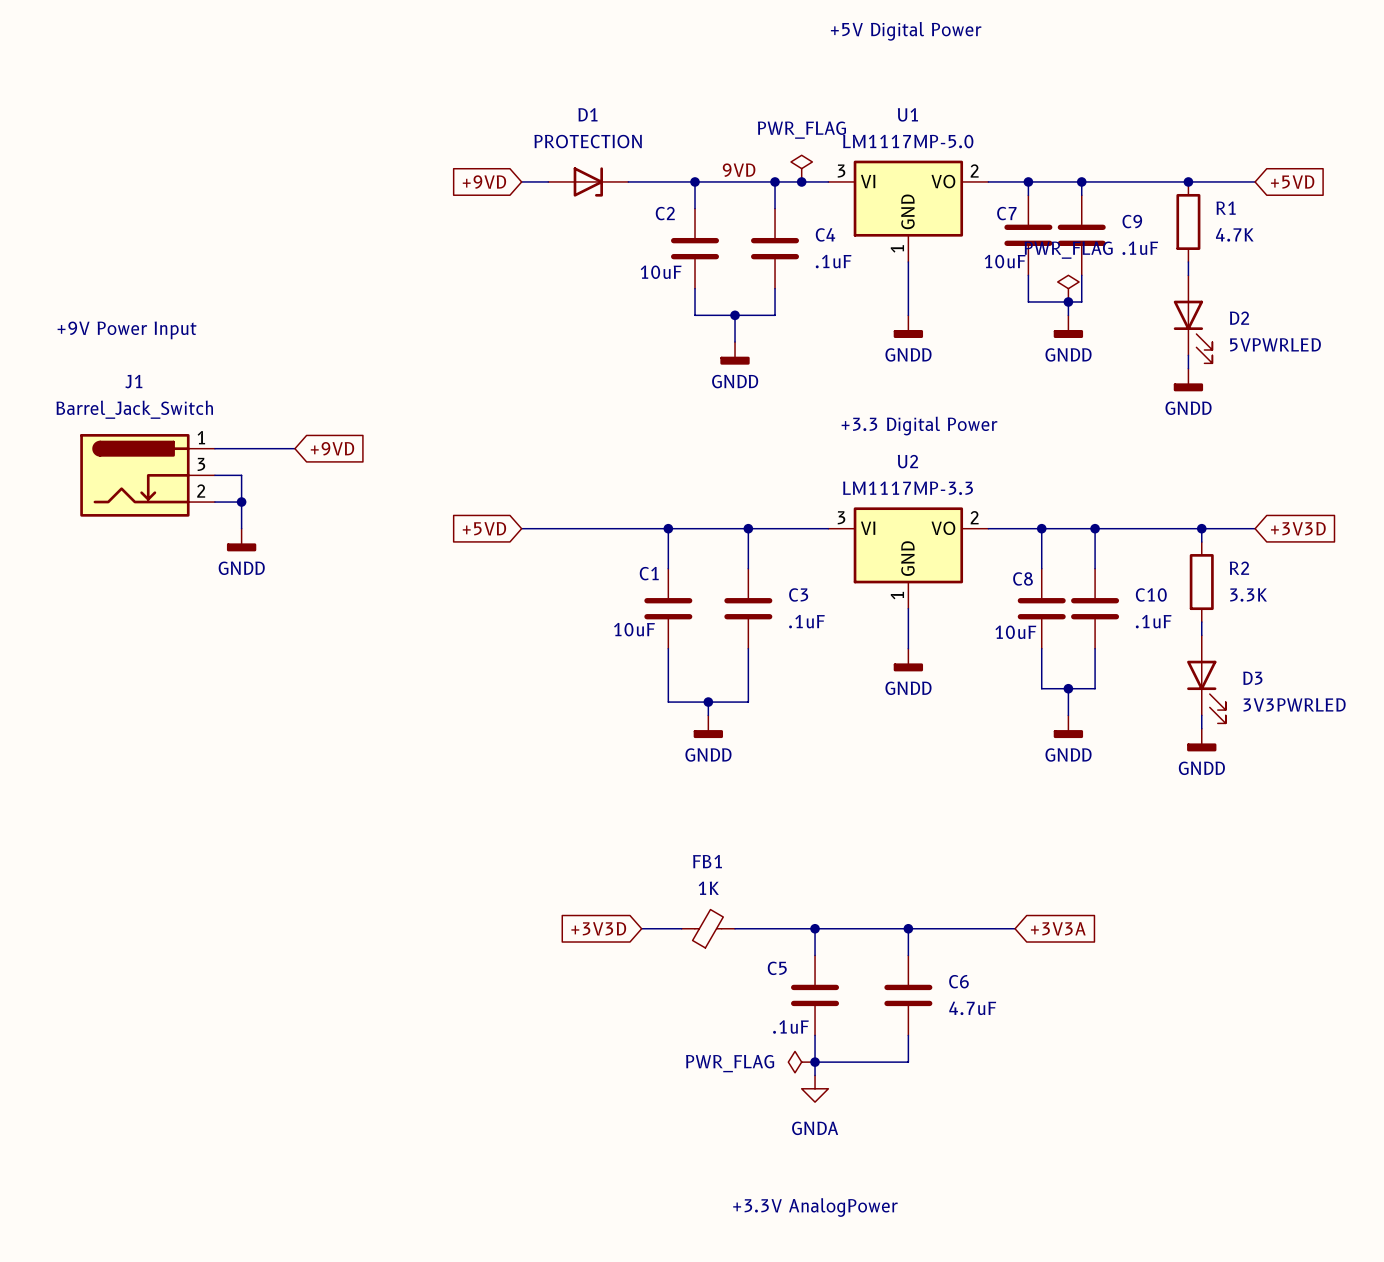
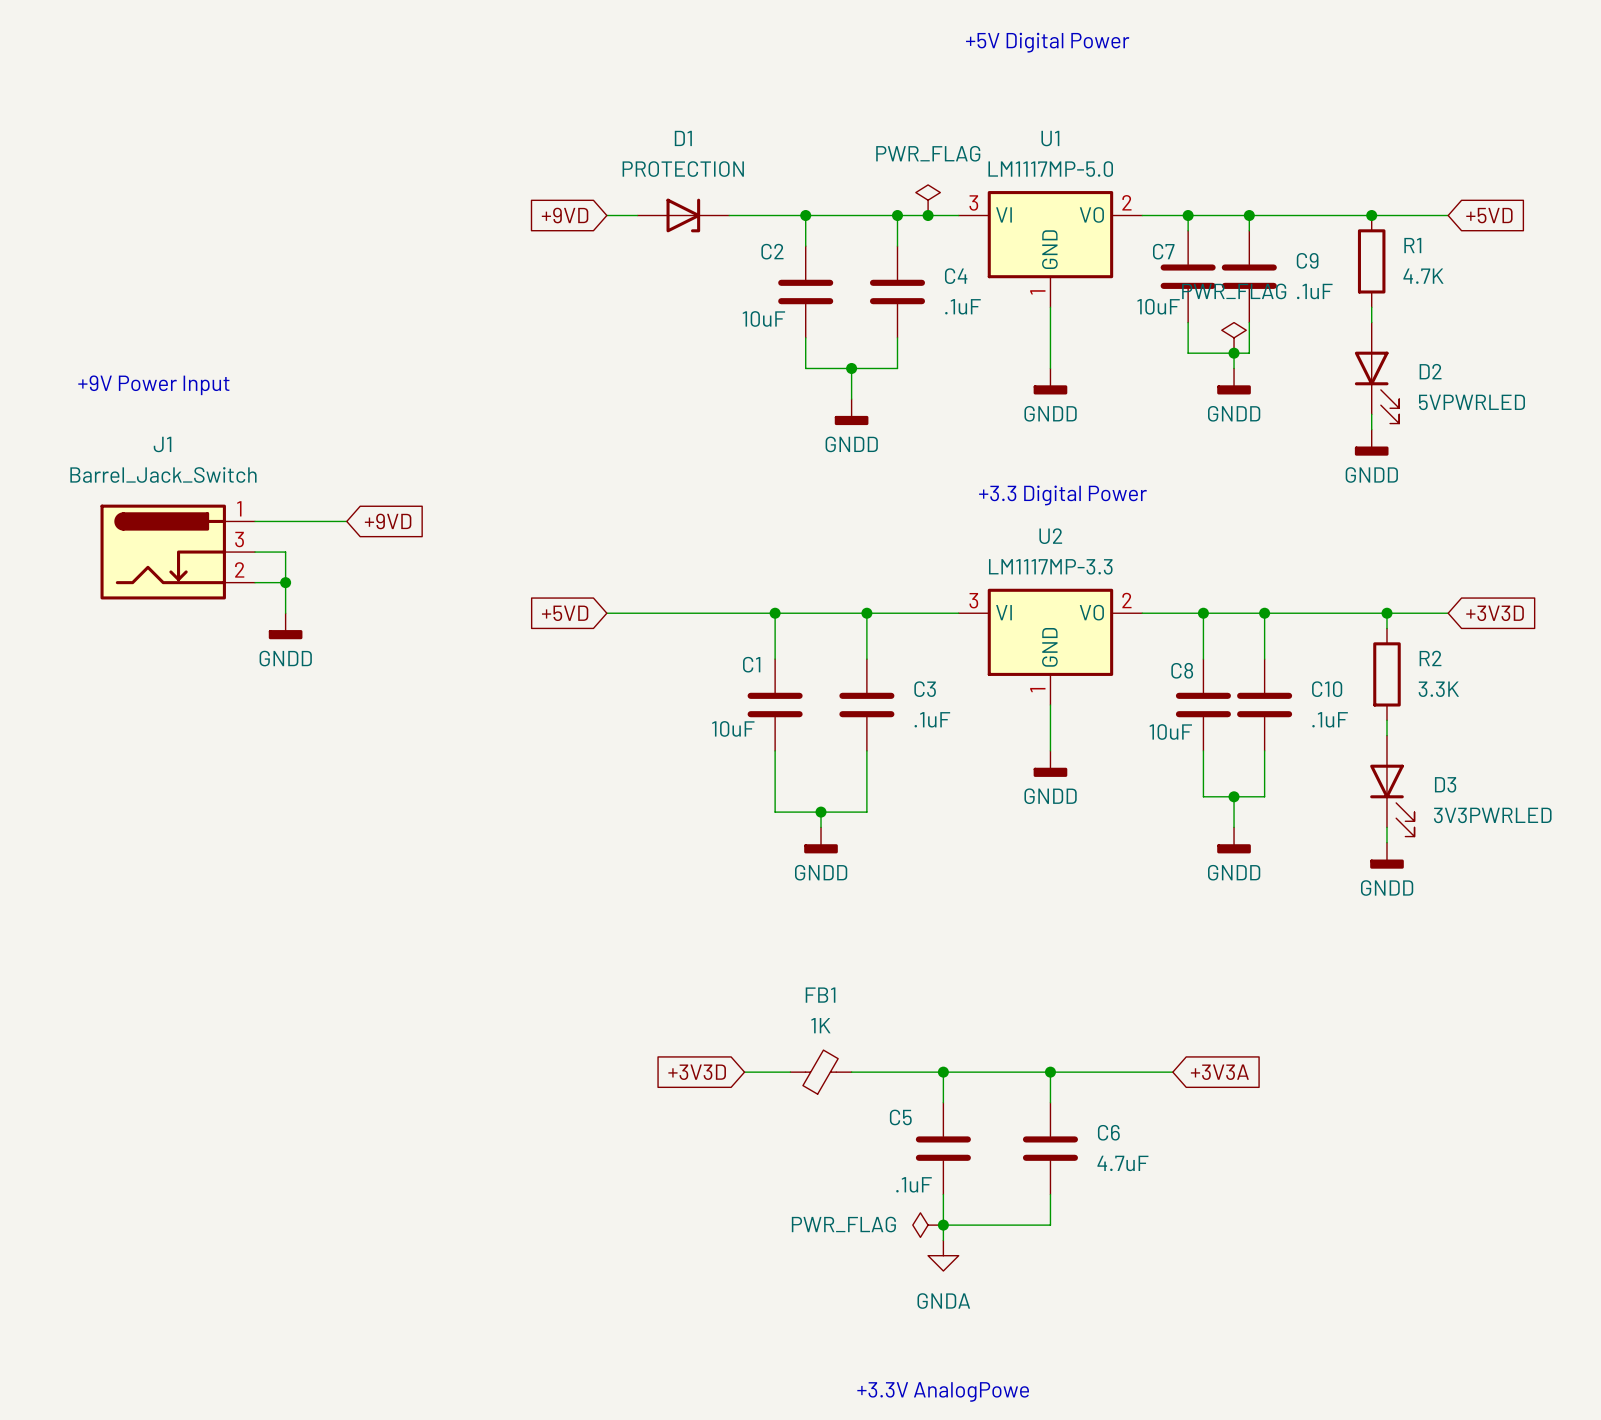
label: 9VD (739, 170) -> none
text: +3.3V AnalogPower (815, 1207) -> +3.3V AnalogPowe (943, 1391)

